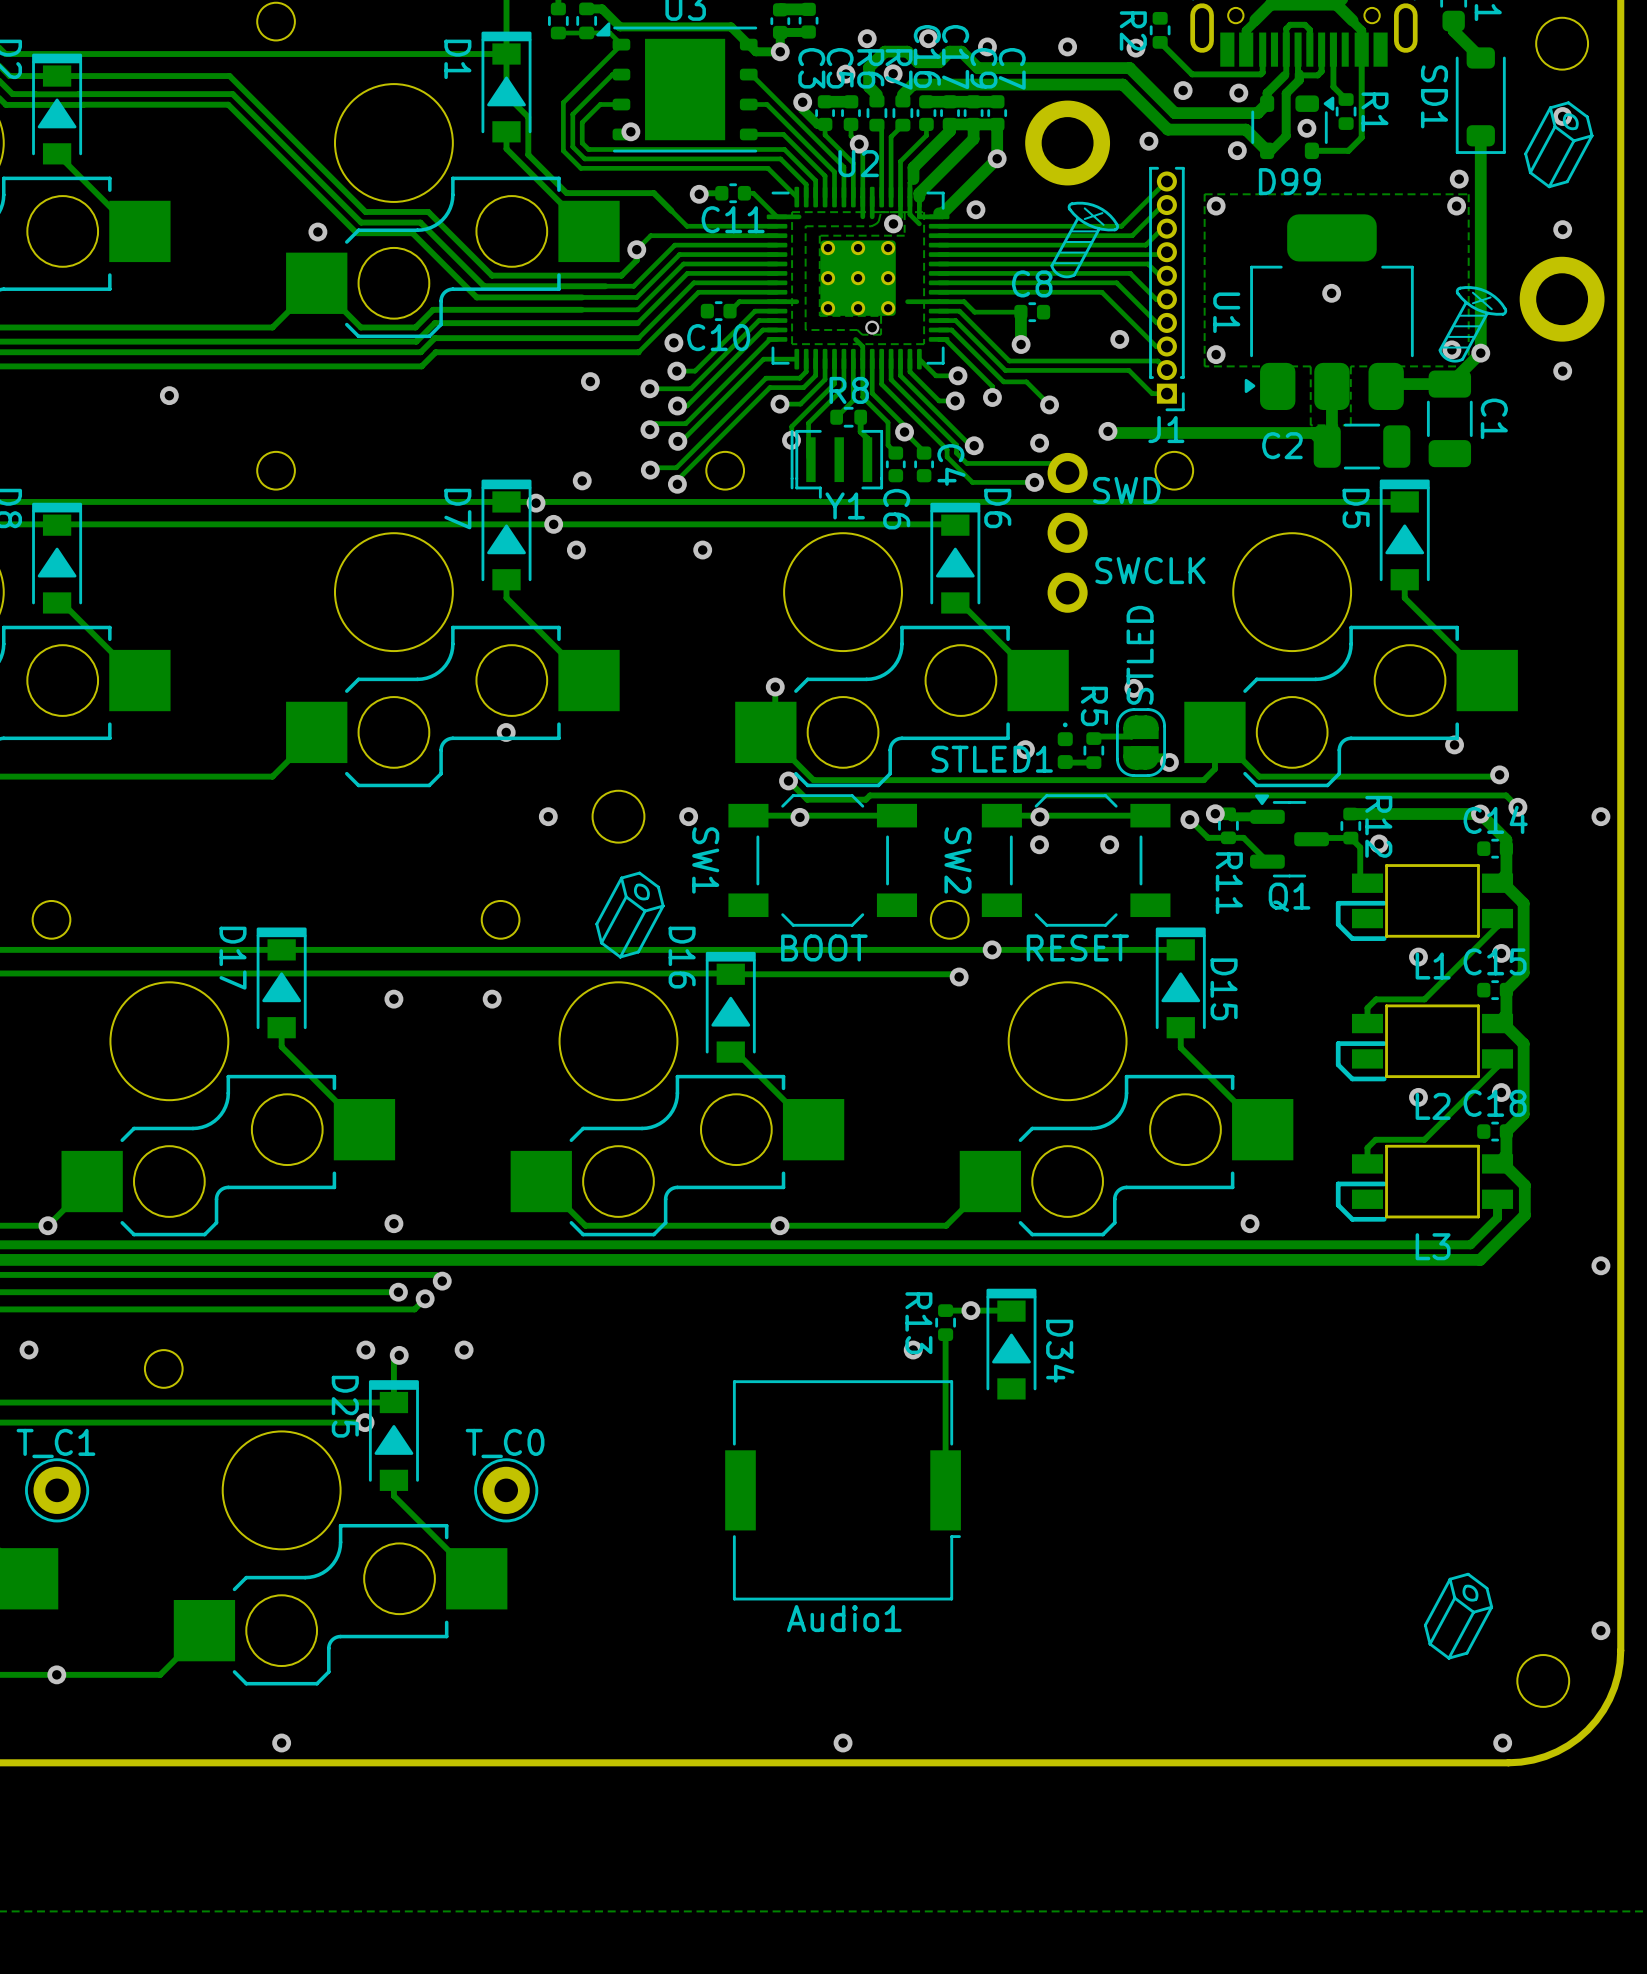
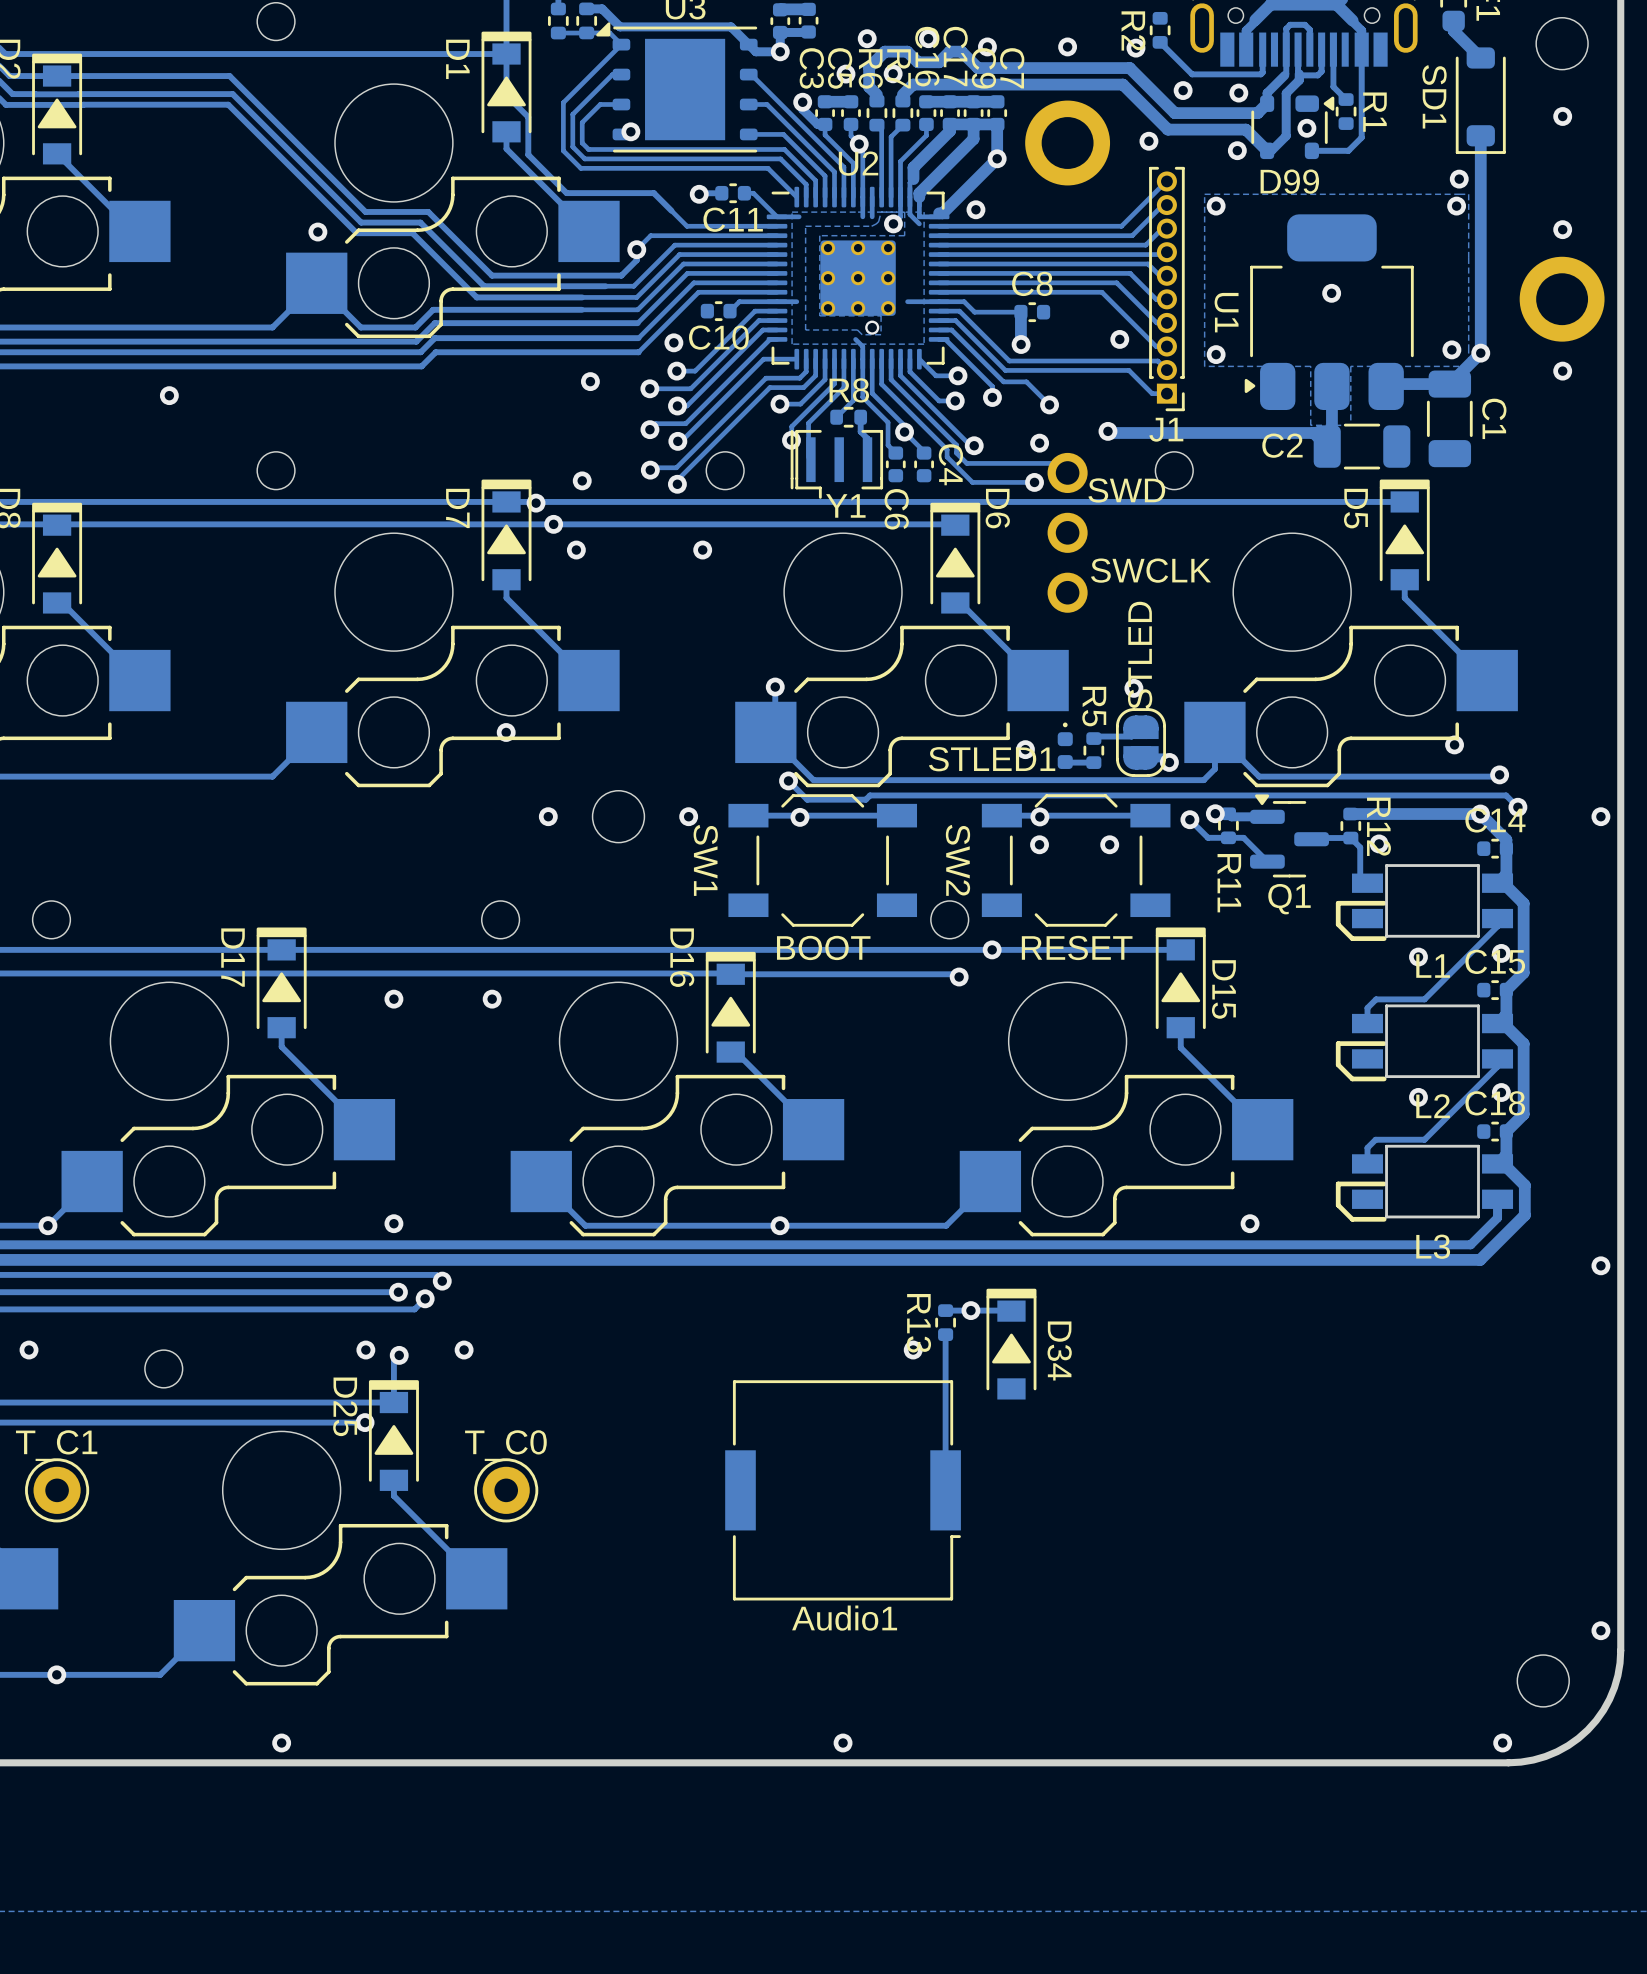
drawing: [1524, 101, 1594, 189] -> none
drawing: [1050, 201, 1120, 279] -> none
drawing: [1438, 286, 1508, 363] -> none
drawing: [595, 871, 665, 959] -> none
drawing: [1423, 1572, 1494, 1660] -> none

